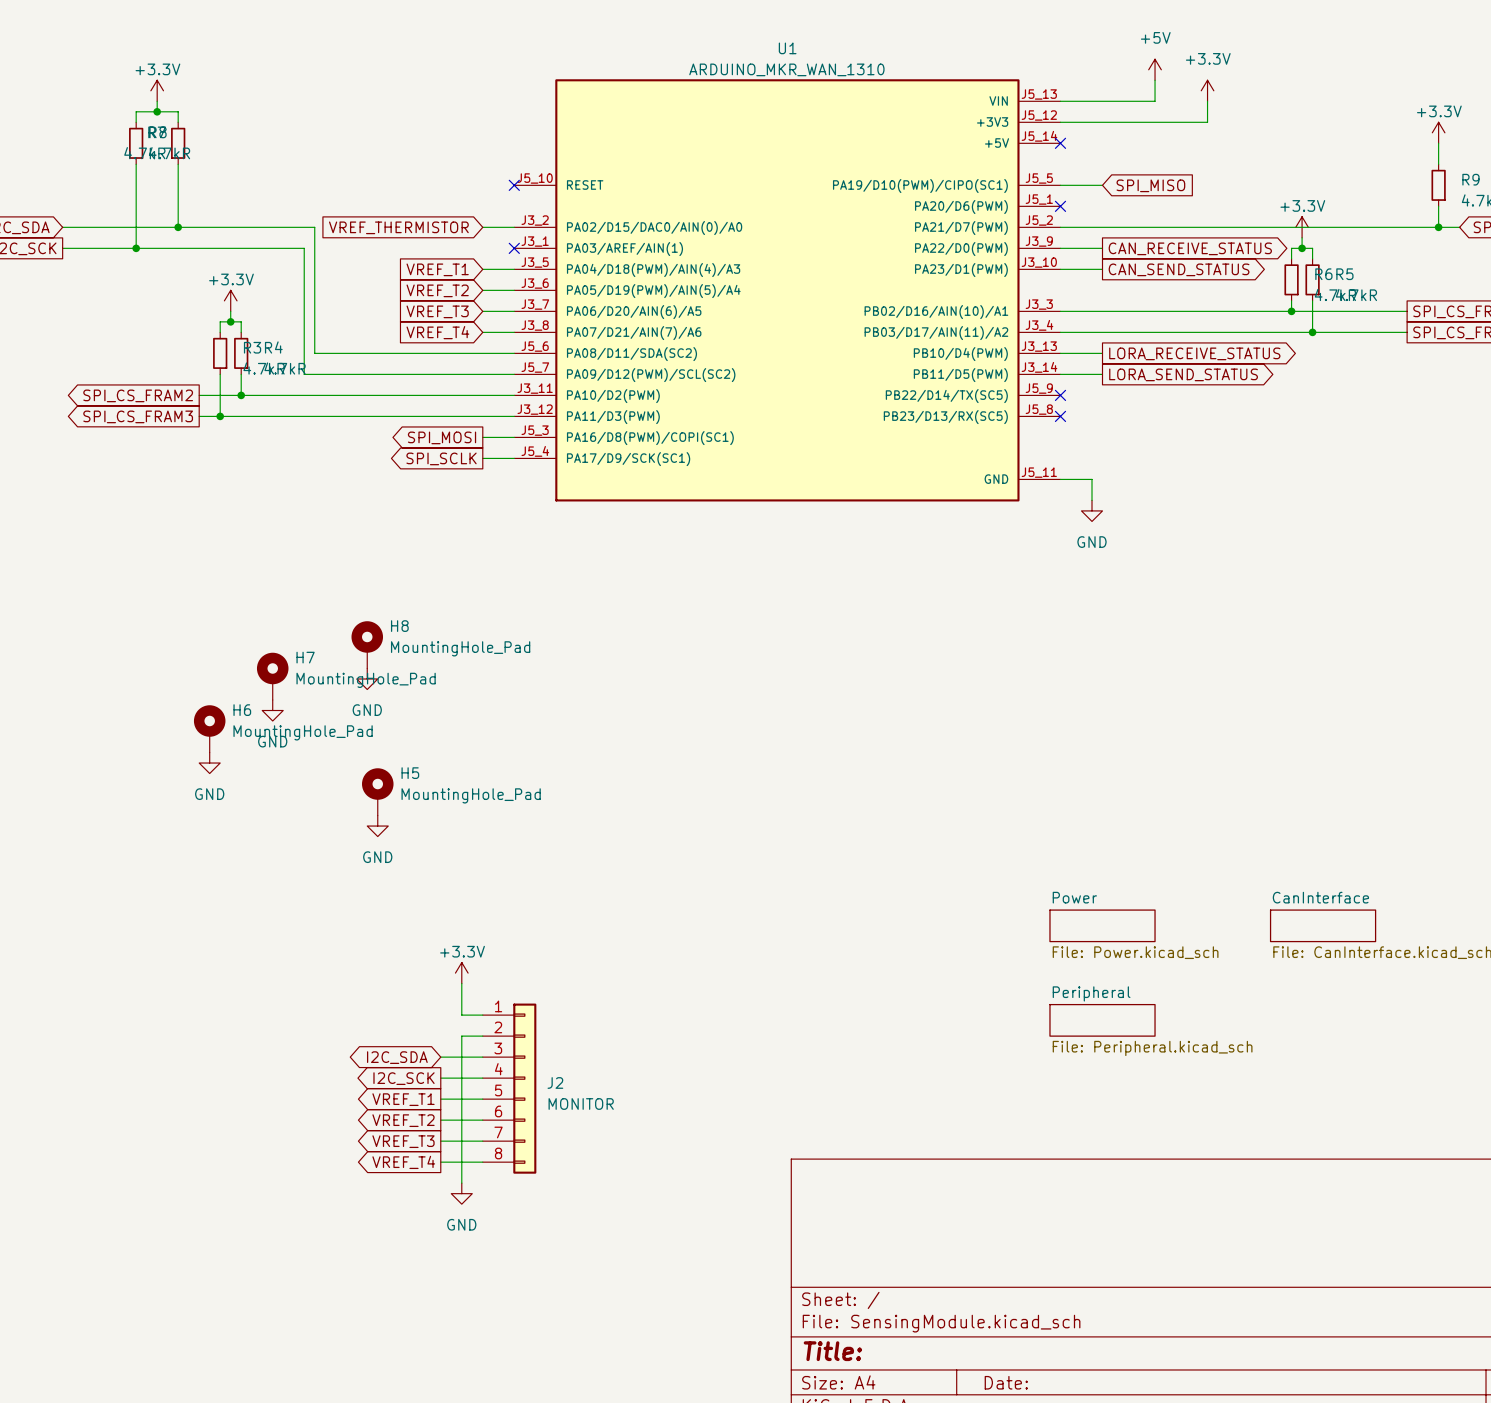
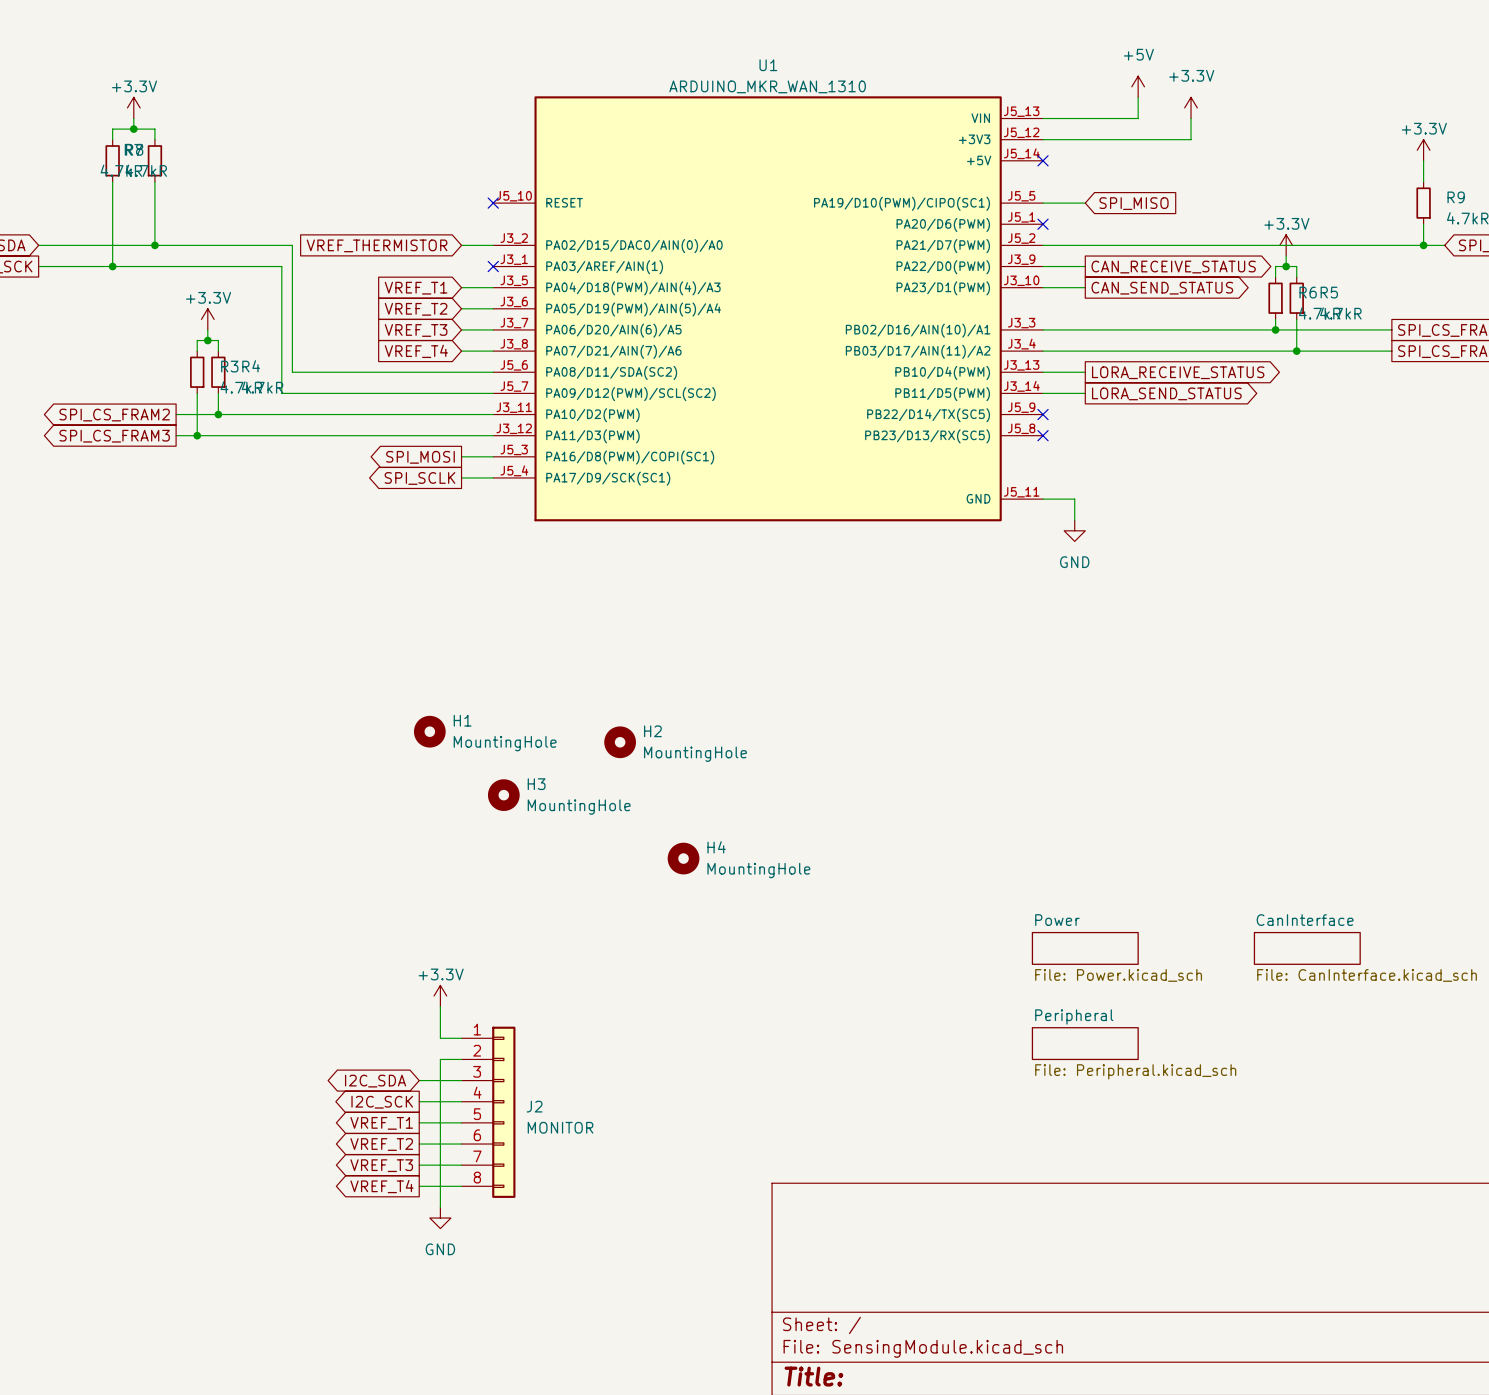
H8: MountingHole_Pad (367, 644) -> none
H7: MountingHole_Pad (272, 676) -> none
power symbol: GND (367, 678) -> none
power symbol: GND (272, 710) -> none
H1: none -> MountingHole (429, 731)
H2: none -> MountingHole (620, 742)
H6: MountingHole_Pad (209, 728) -> none
power symbol: GND (209, 763) -> none
H3: none -> MountingHole (503, 795)
H5: MountingHole_Pad (377, 791) -> none
power symbol: GND (377, 826) -> none
H4: none -> MountingHole (683, 858)

